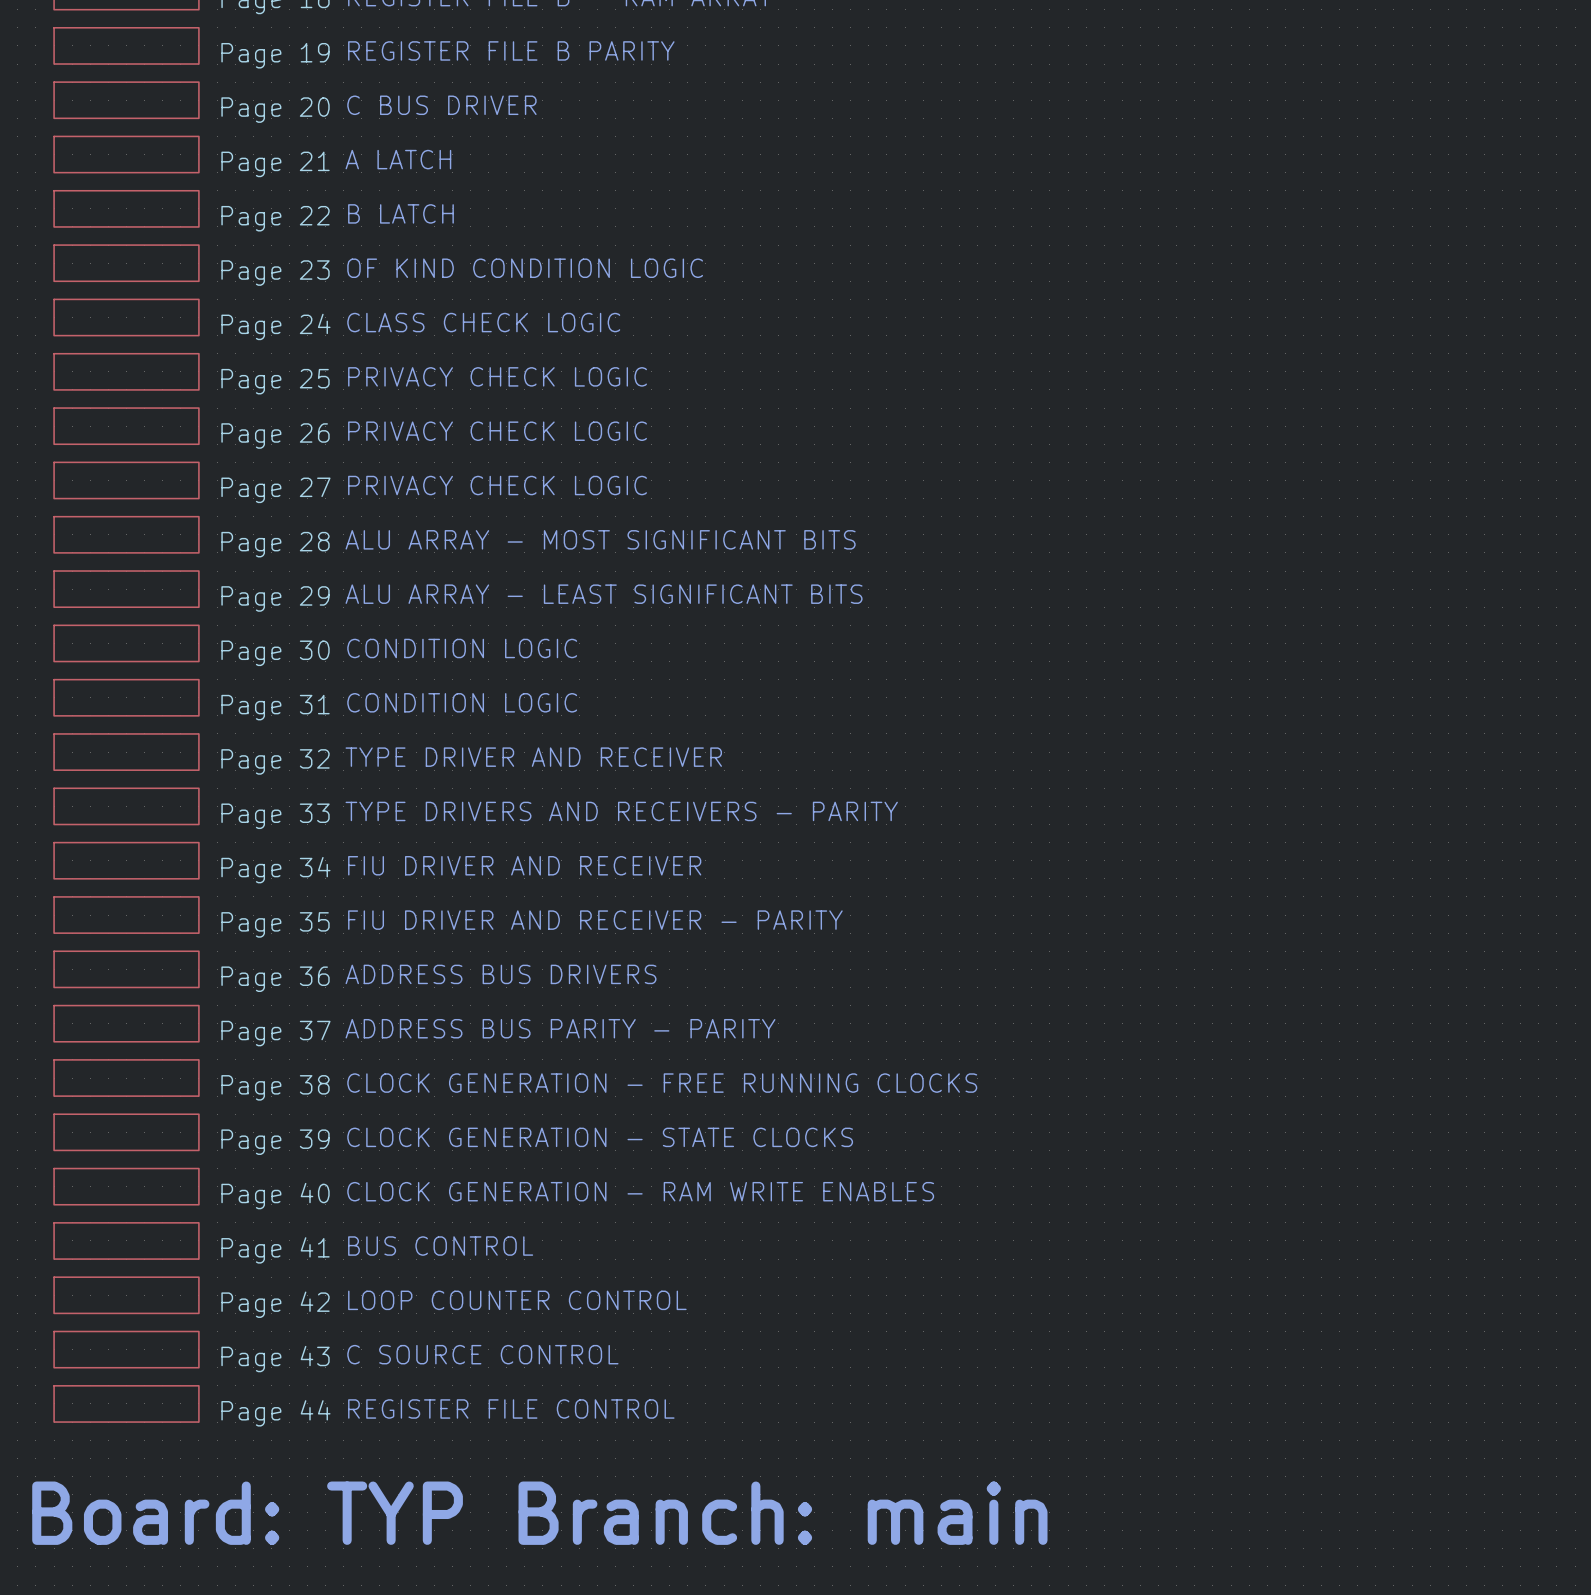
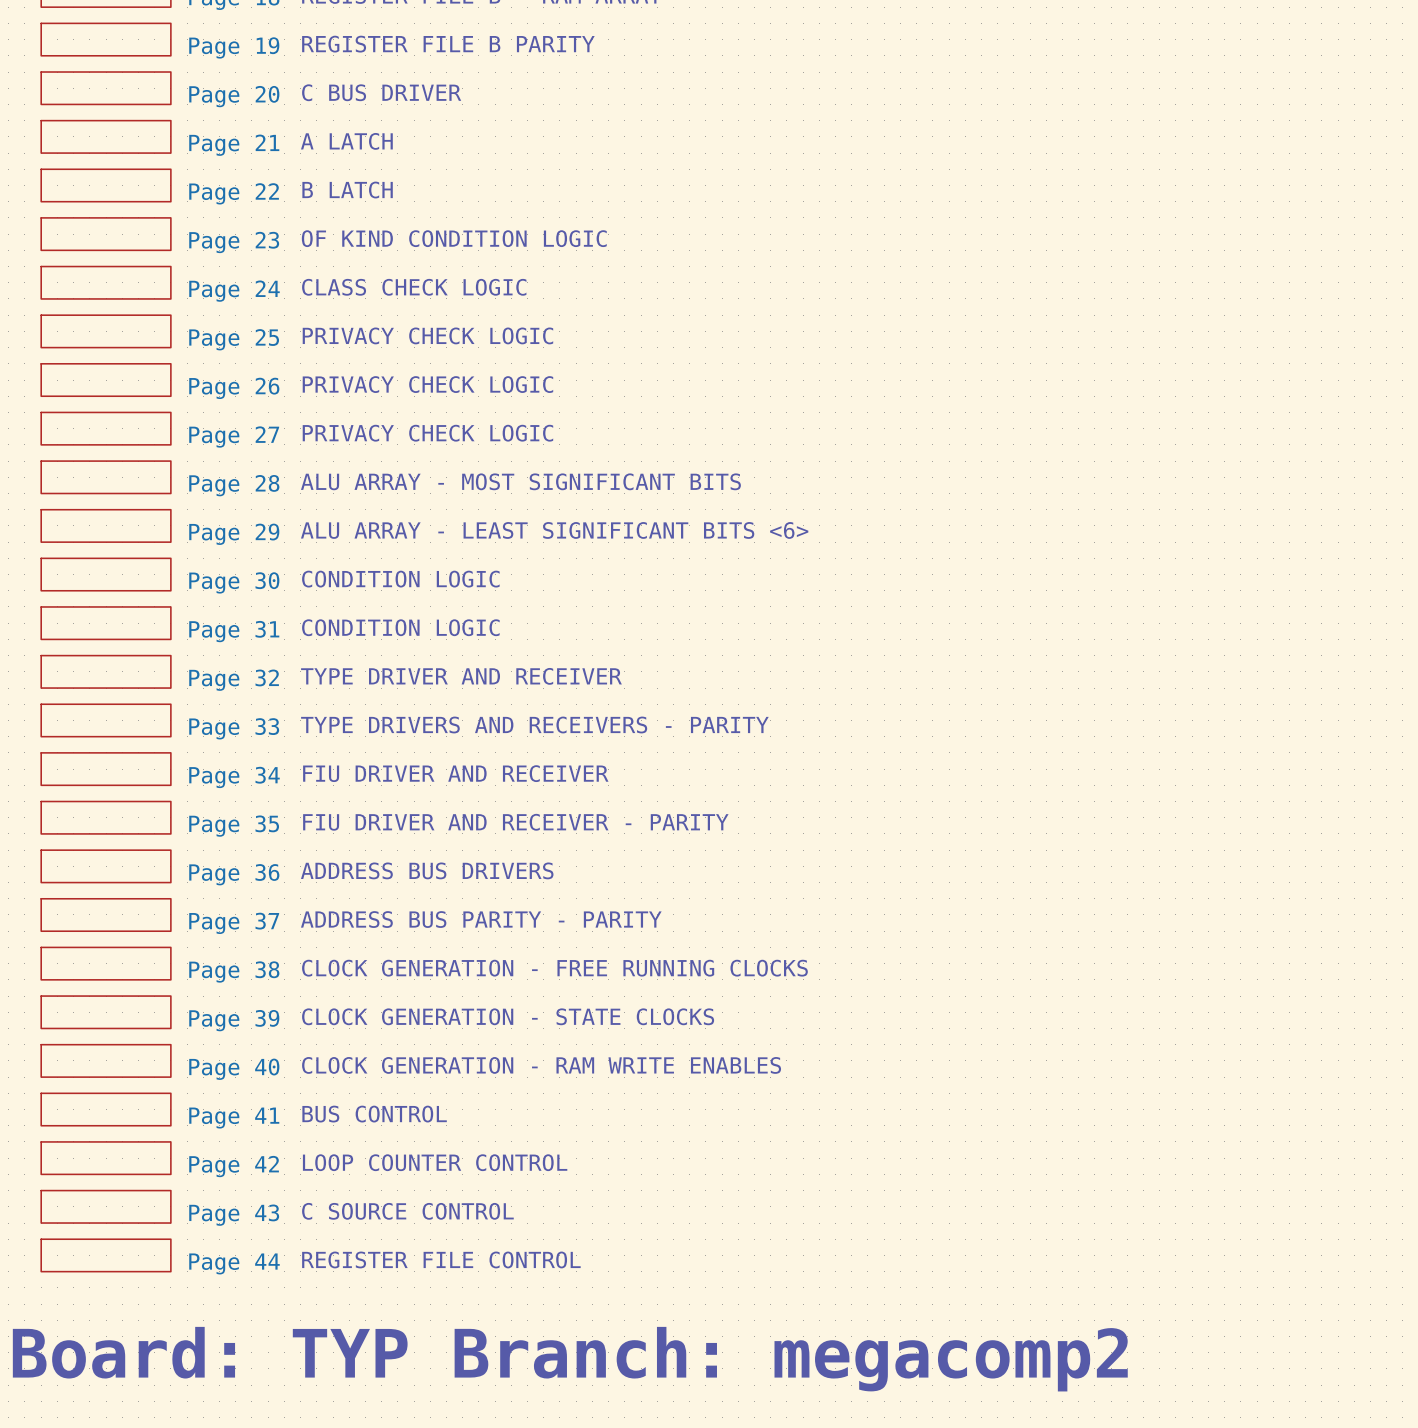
text: ALU ARRAY - LEAST SIGNIFICANT BITS (604, 594) -> ALU ARRAY - LEAST SIGNIFICANT BITS <6> (554, 530)
text: Board: TYP Branch: main (539, 1513) -> Board: TYP Branch: megacomp2 (570, 1359)

